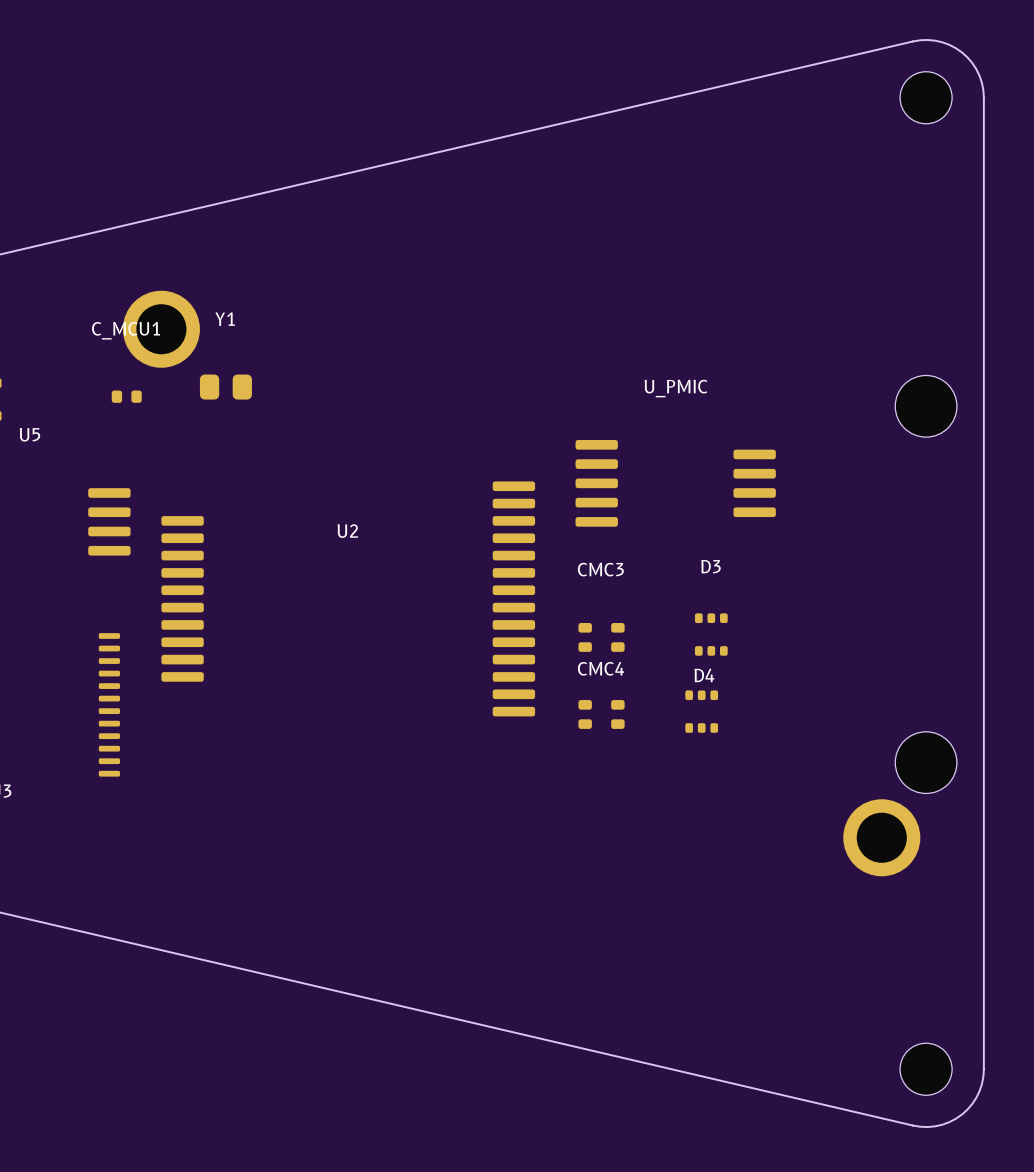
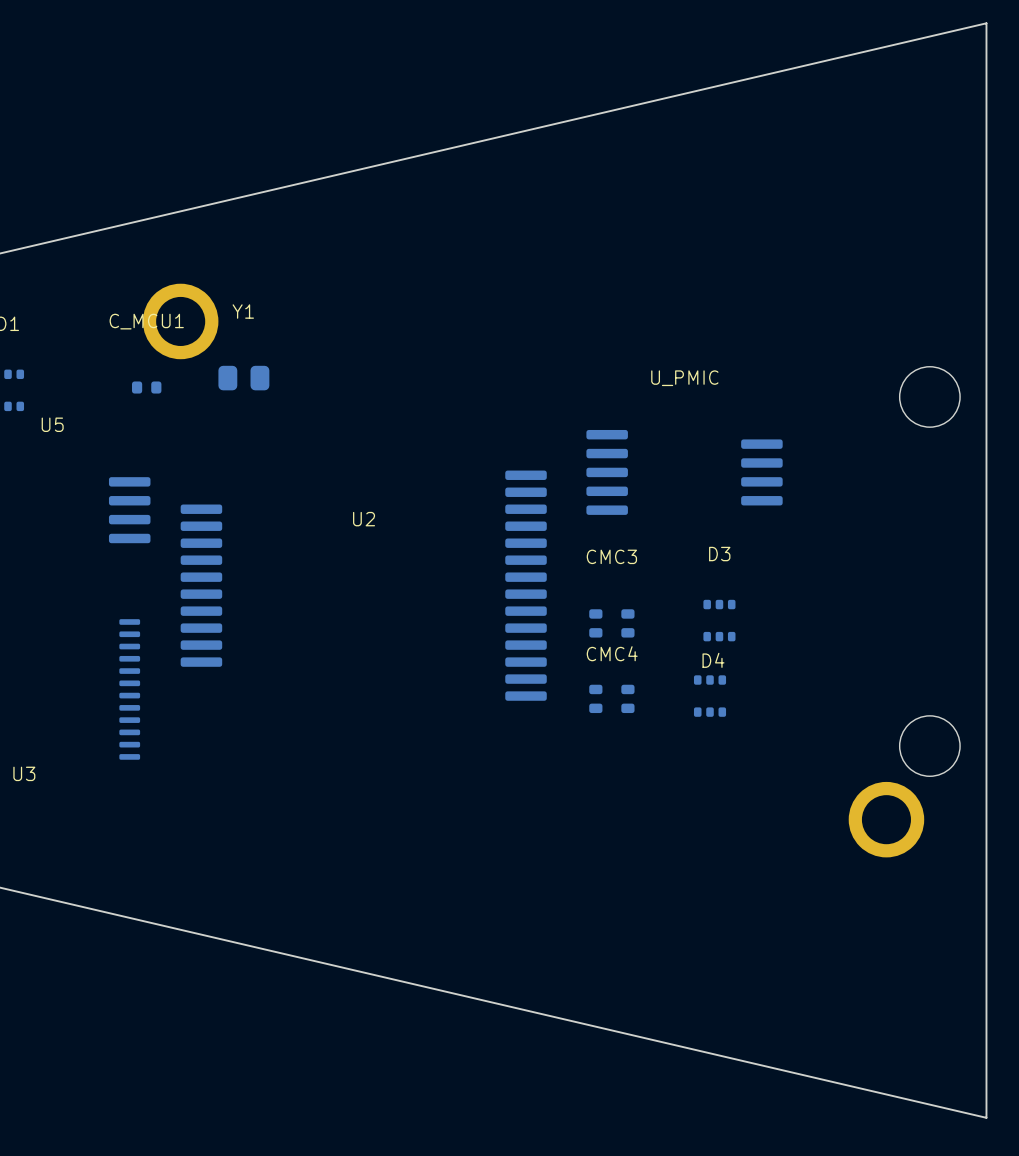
board edge: (912, 41) (935, 40) (949, 44) (962, 52) (972, 63) (979, 76) (983, 97) -> (916, 39) (986, 23) (986, 94)
part: (926, 97) -> none
part: (926, 1069) -> none
board edge: (983, 1069) (981, 1083) (976, 1097) (962, 1114) (949, 1122) (935, 1126) (912, 1125) -> (986, 1046) (986, 1117) (916, 1101)

